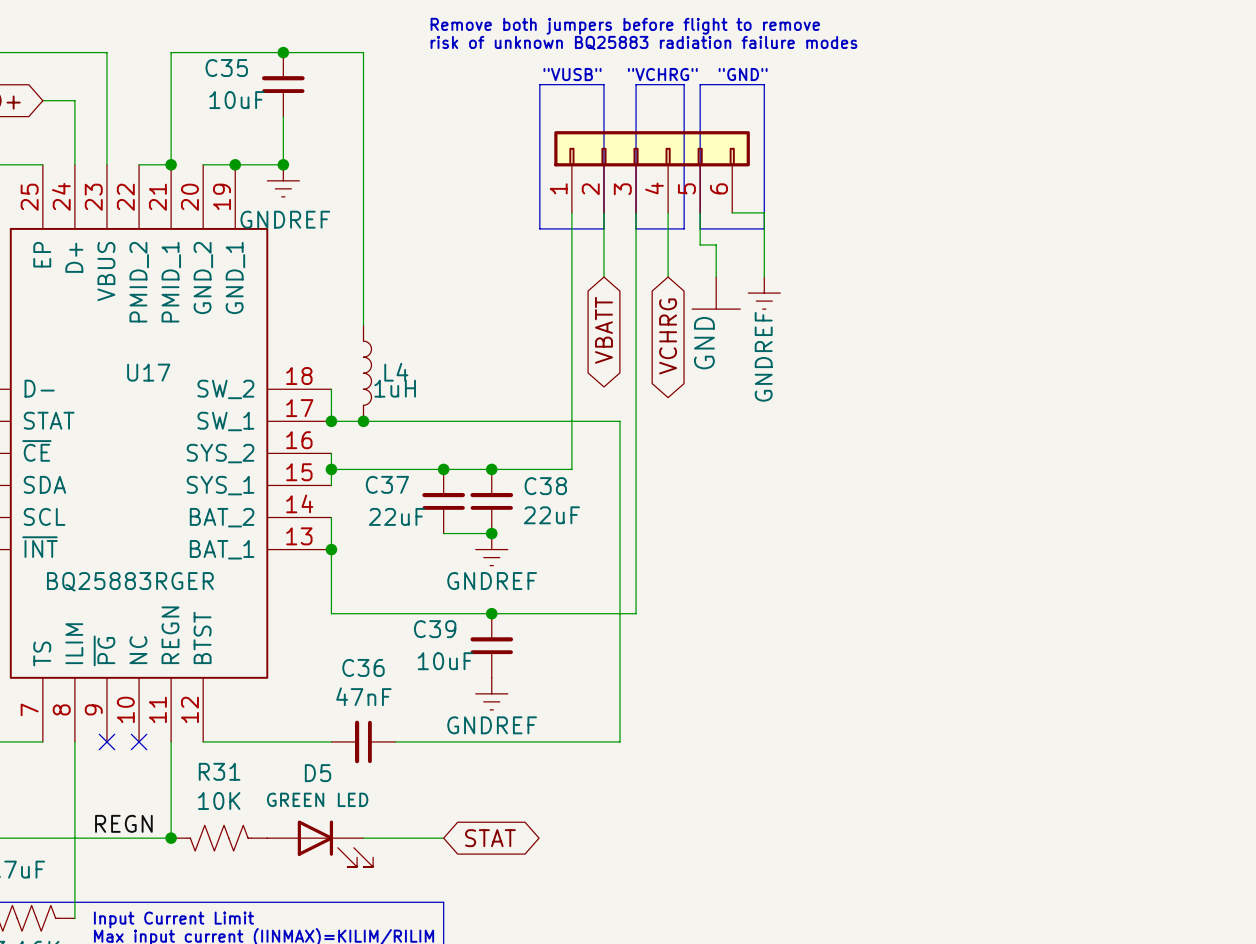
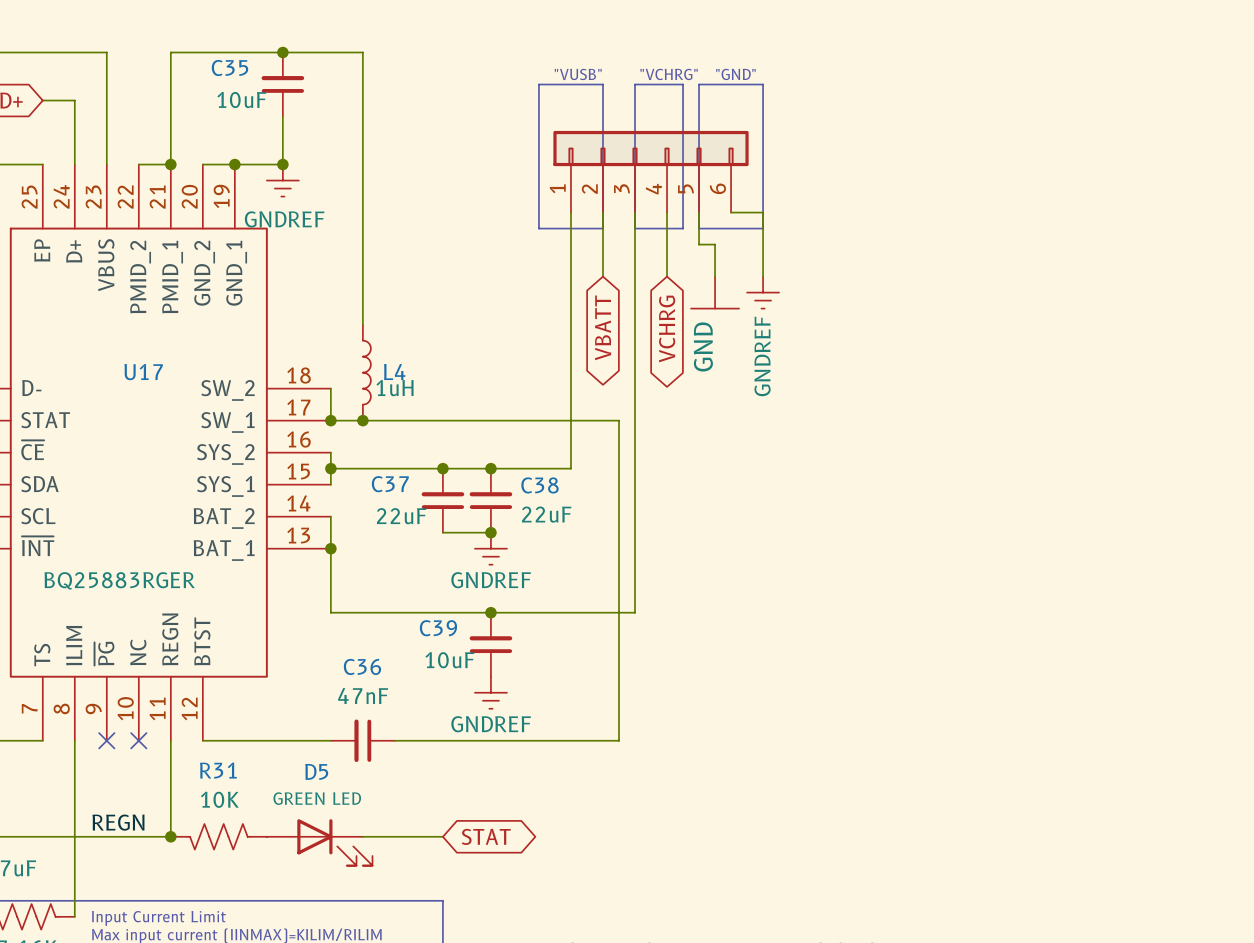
text: Remove both jumpers before flight to remove (625, 26) -> none
text: risk of unknown BQ25883 radiation failure modes (643, 42) -> none

